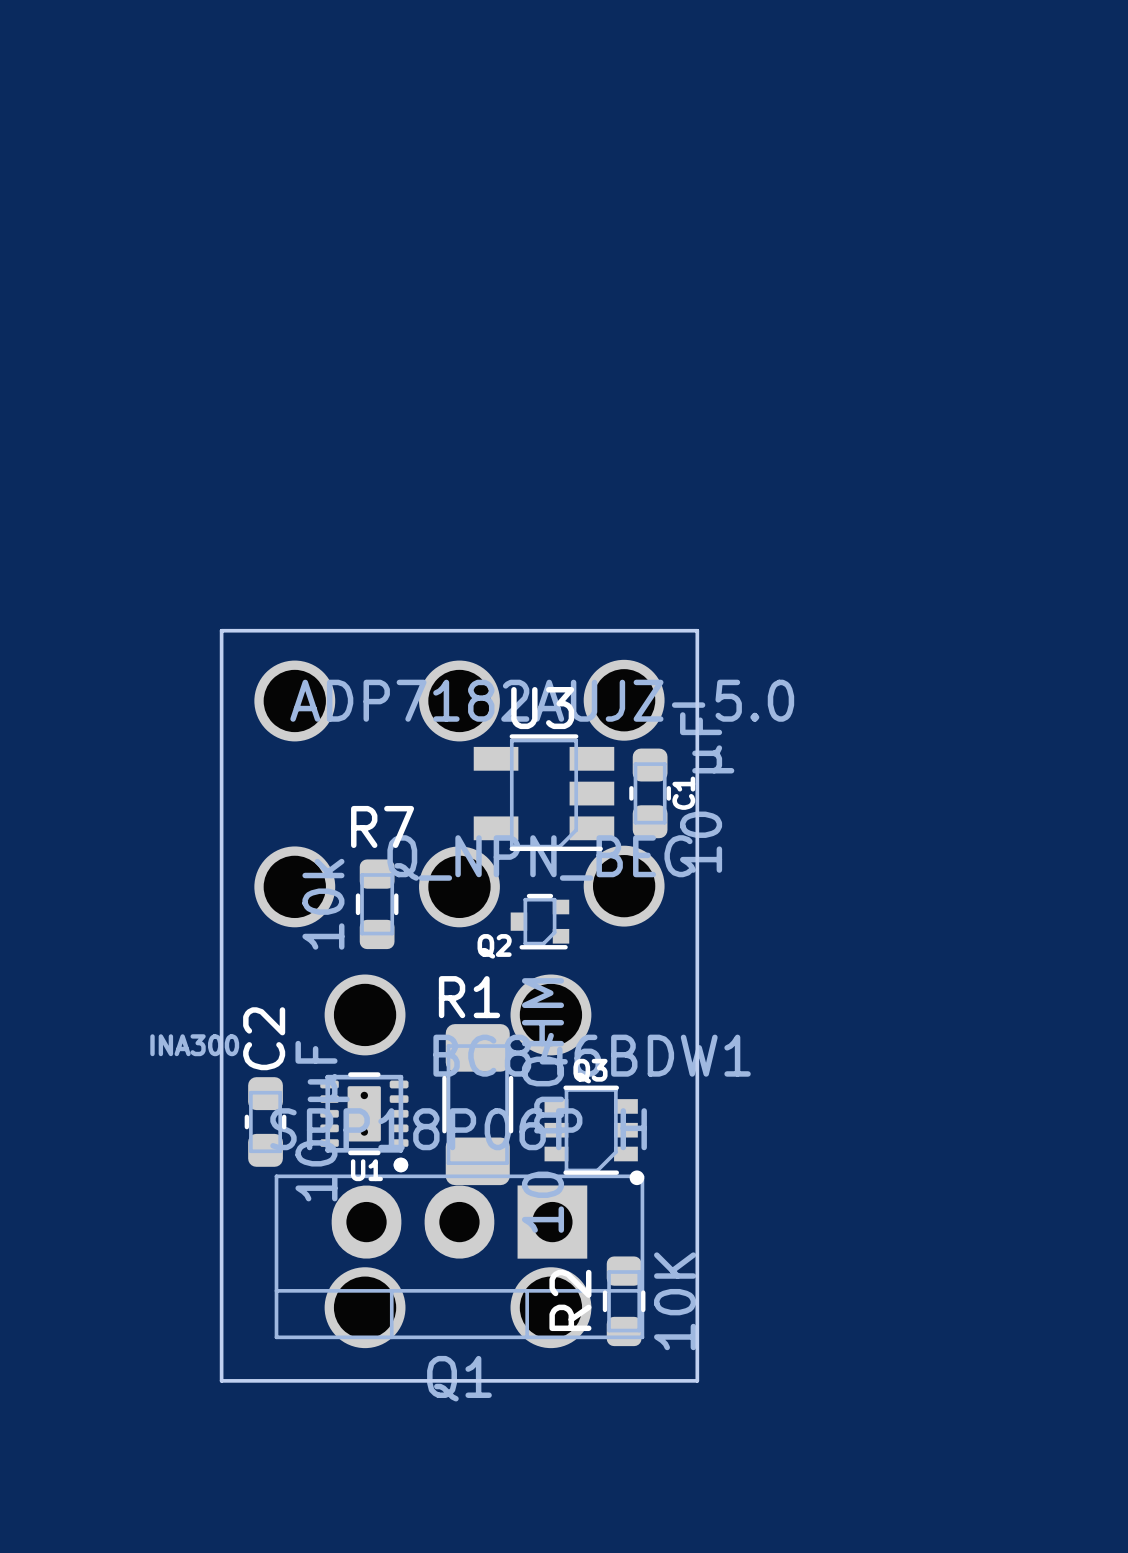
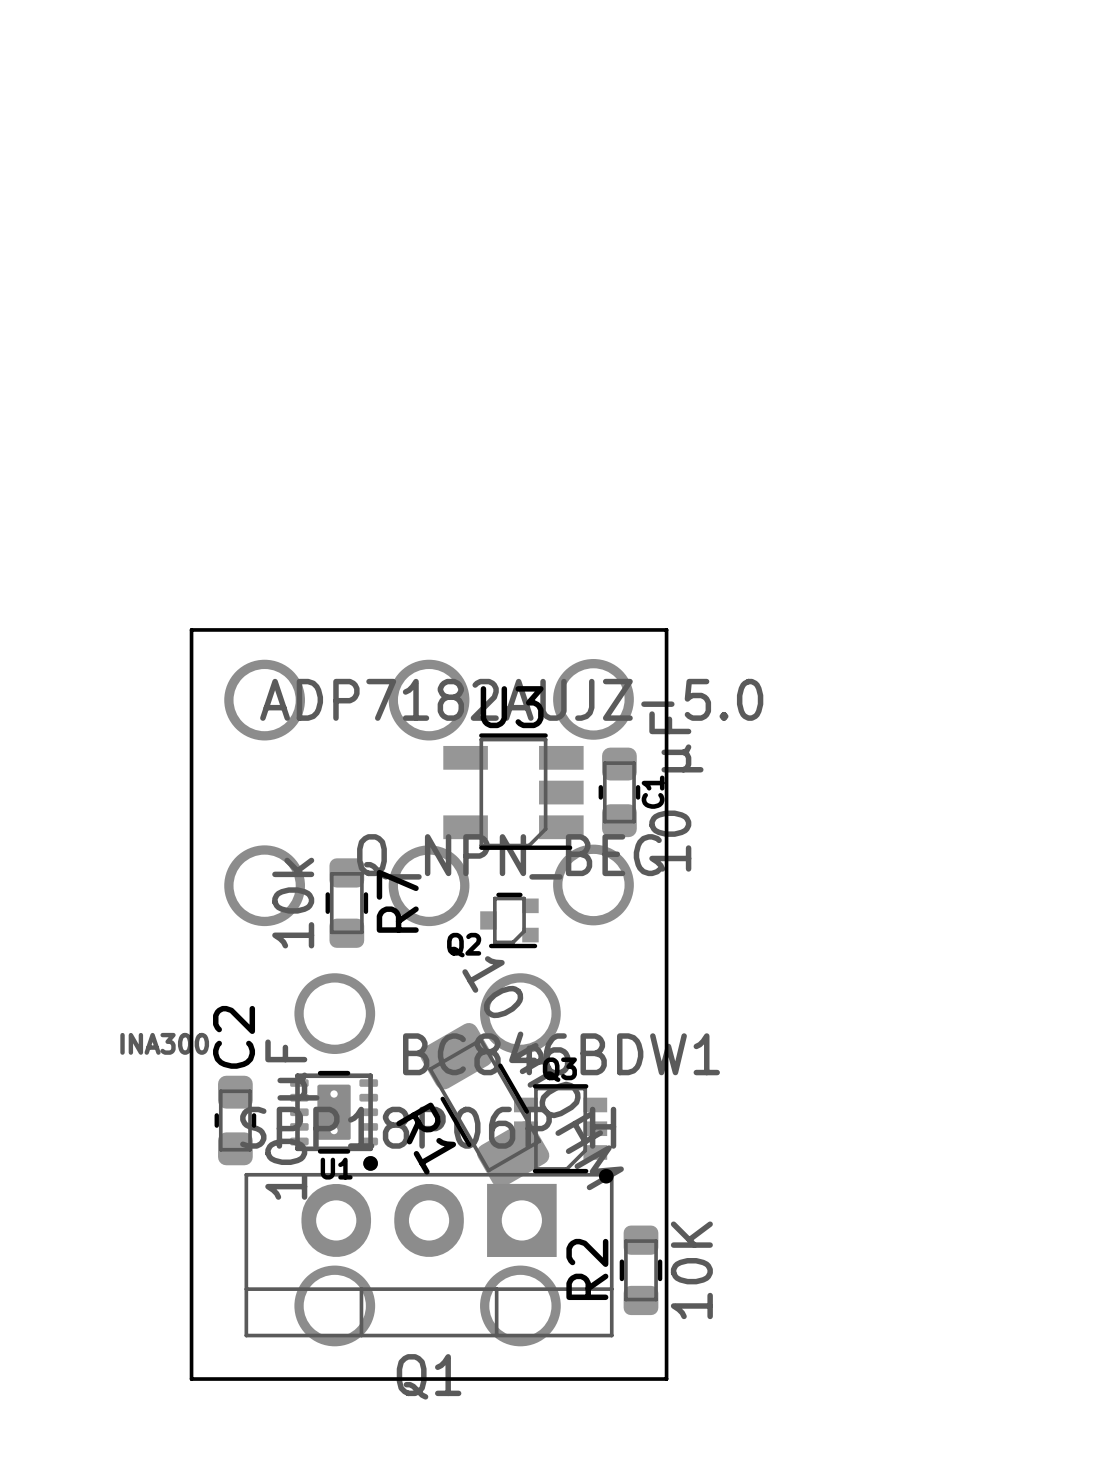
R7 name rotation: 0° (382, 826) -> 90° counterclockwise (397, 901)
R1 name position: R1 (469, 997) -> R1 (426, 1138)
R1 rotation: 0° (477, 1104) -> 30° counterclockwise (484, 1105)
R2 position: (624, 1301) -> (640, 1270)

